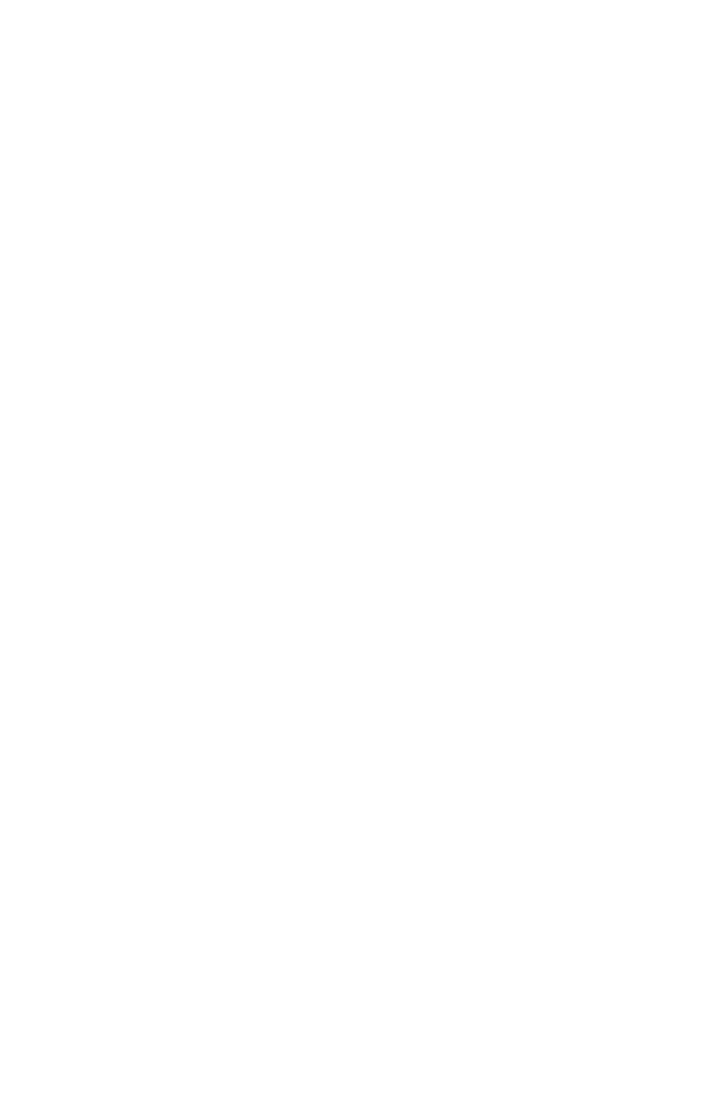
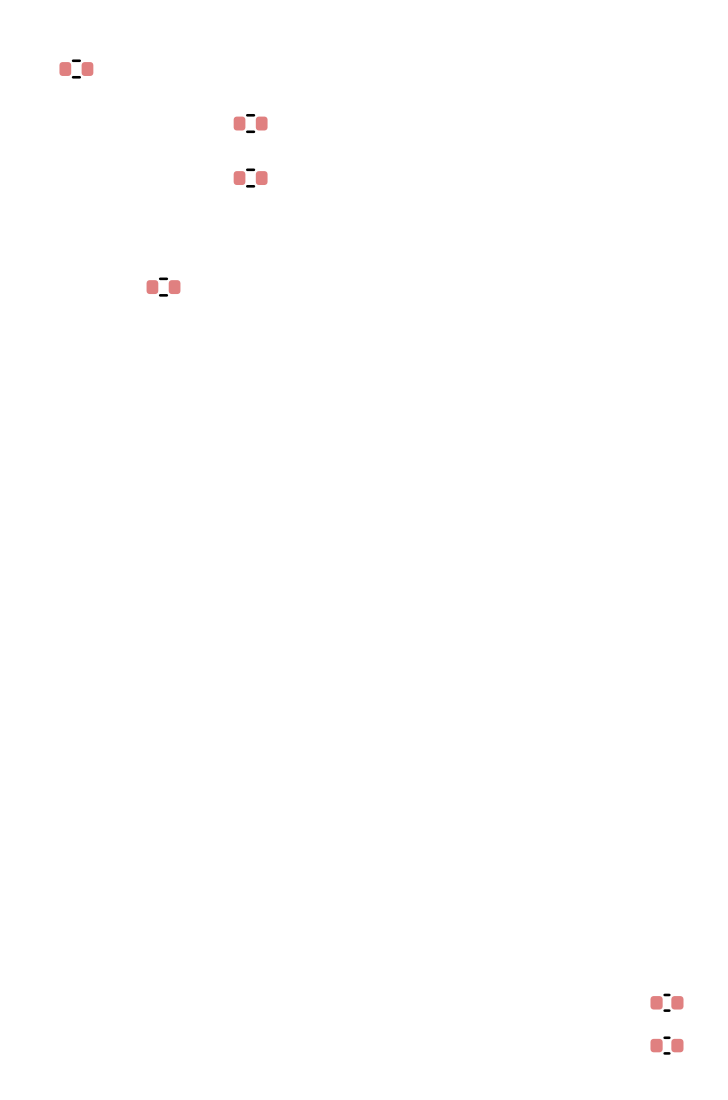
part: none -> (76, 69)
part: none -> (250, 123)
part: none -> (250, 178)
part: none -> (163, 287)
part: none -> (666, 1002)
part: none -> (666, 1045)

